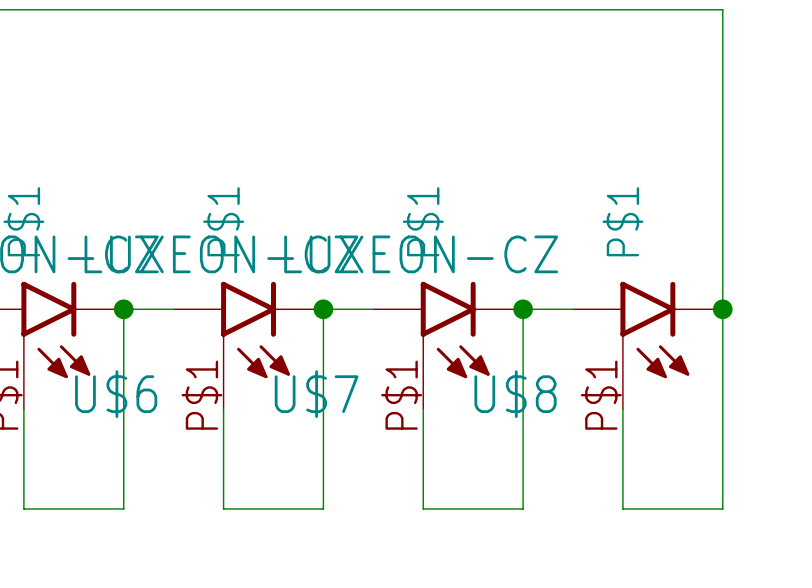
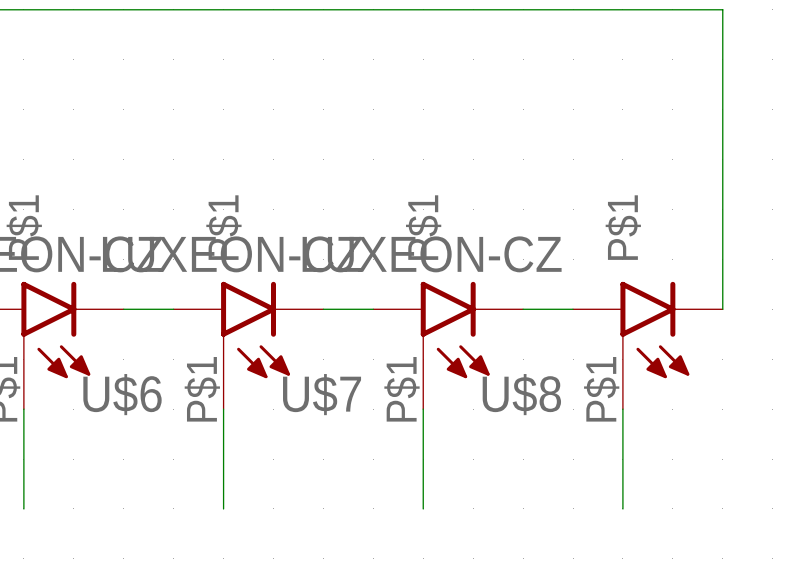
wire: (123, 309) (123, 508) (23, 508) -> none
junction: (123, 309) -> none
wire: (323, 309) (323, 508) (223, 508) -> none
junction: (323, 309) -> none
wire: (523, 309) (523, 508) (423, 508) -> none
junction: (523, 309) -> none
wire: (722, 309) (722, 508) (622, 508) -> none
junction: (722, 309) -> none

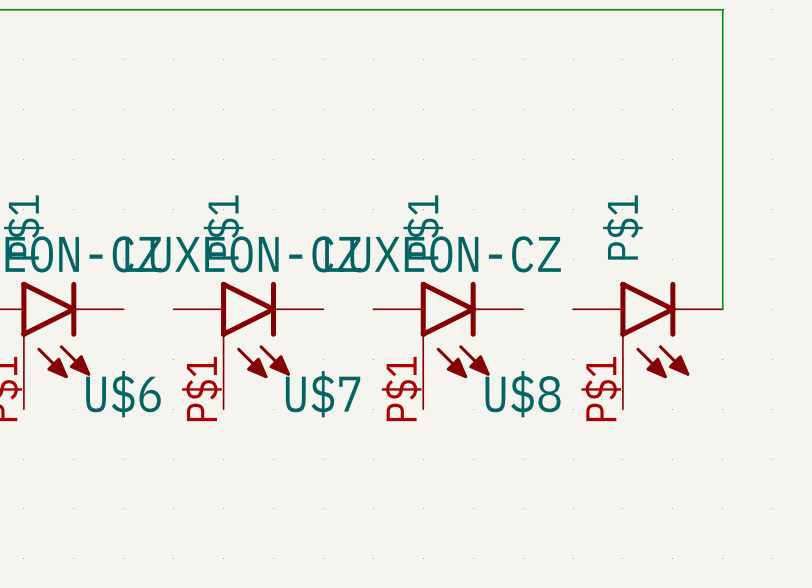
wire: (123, 309) (173, 309) -> none
wire: (323, 309) (373, 309) -> none
wire: (523, 309) (573, 309) -> none
wire: (23, 409) (23, 508) -> none
wire: (223, 409) (223, 508) -> none
wire: (423, 409) (423, 508) -> none
wire: (622, 409) (622, 508) -> none

